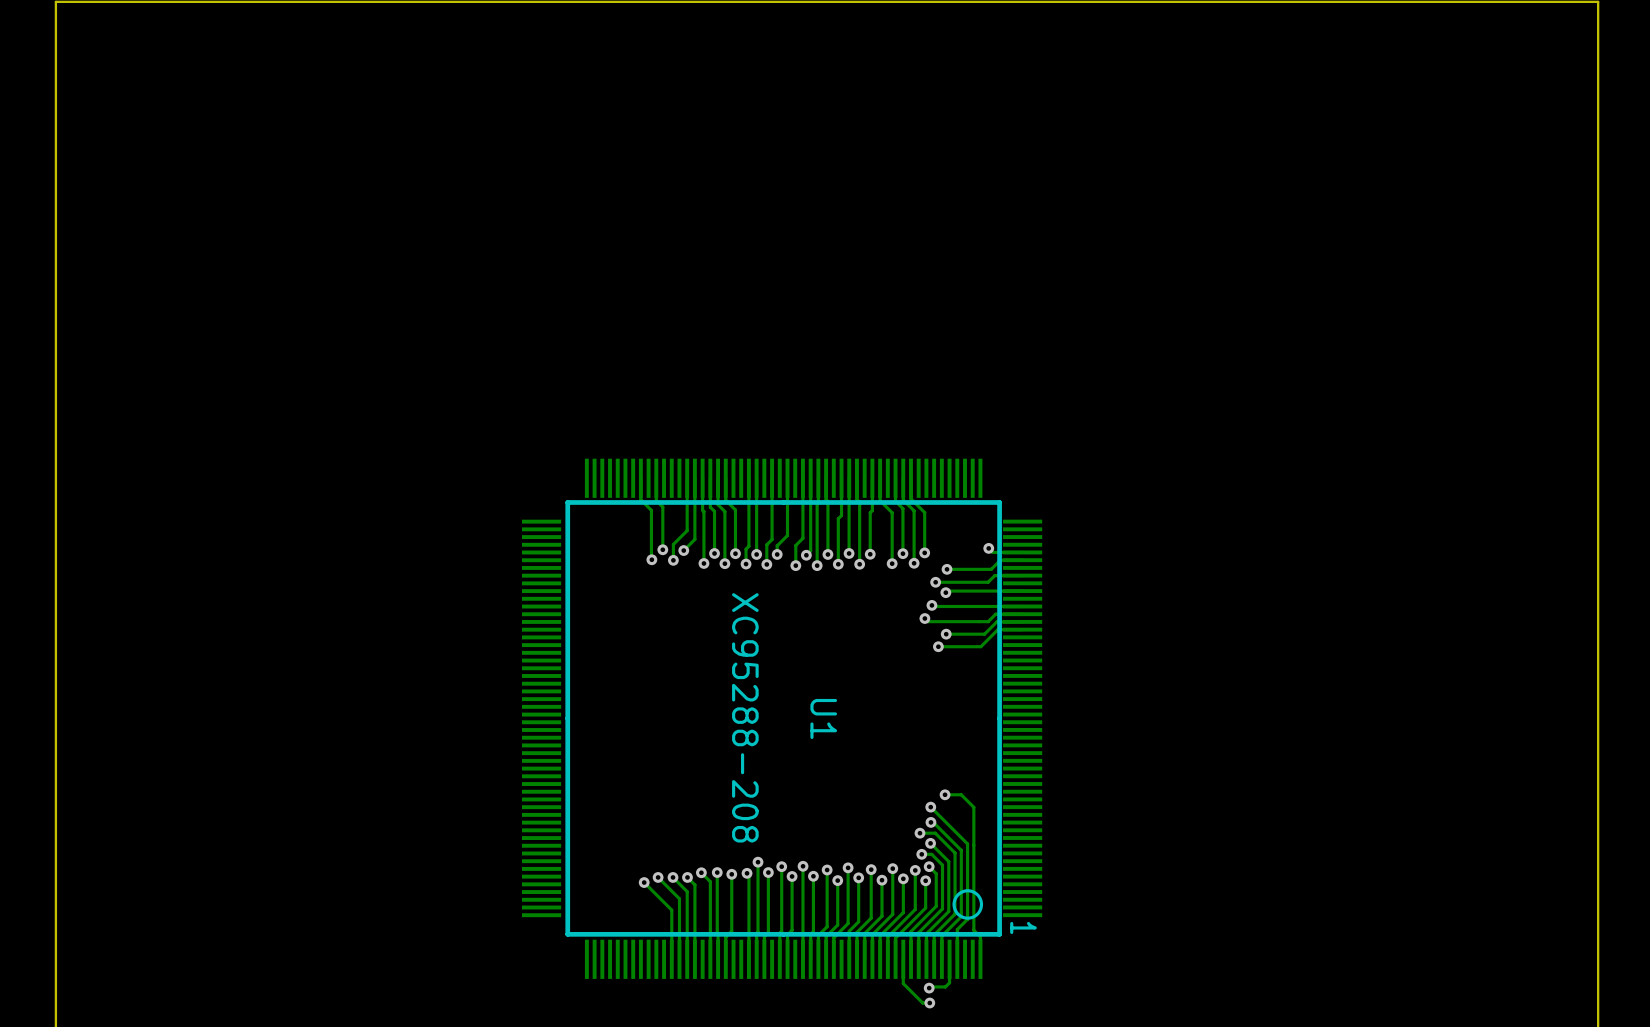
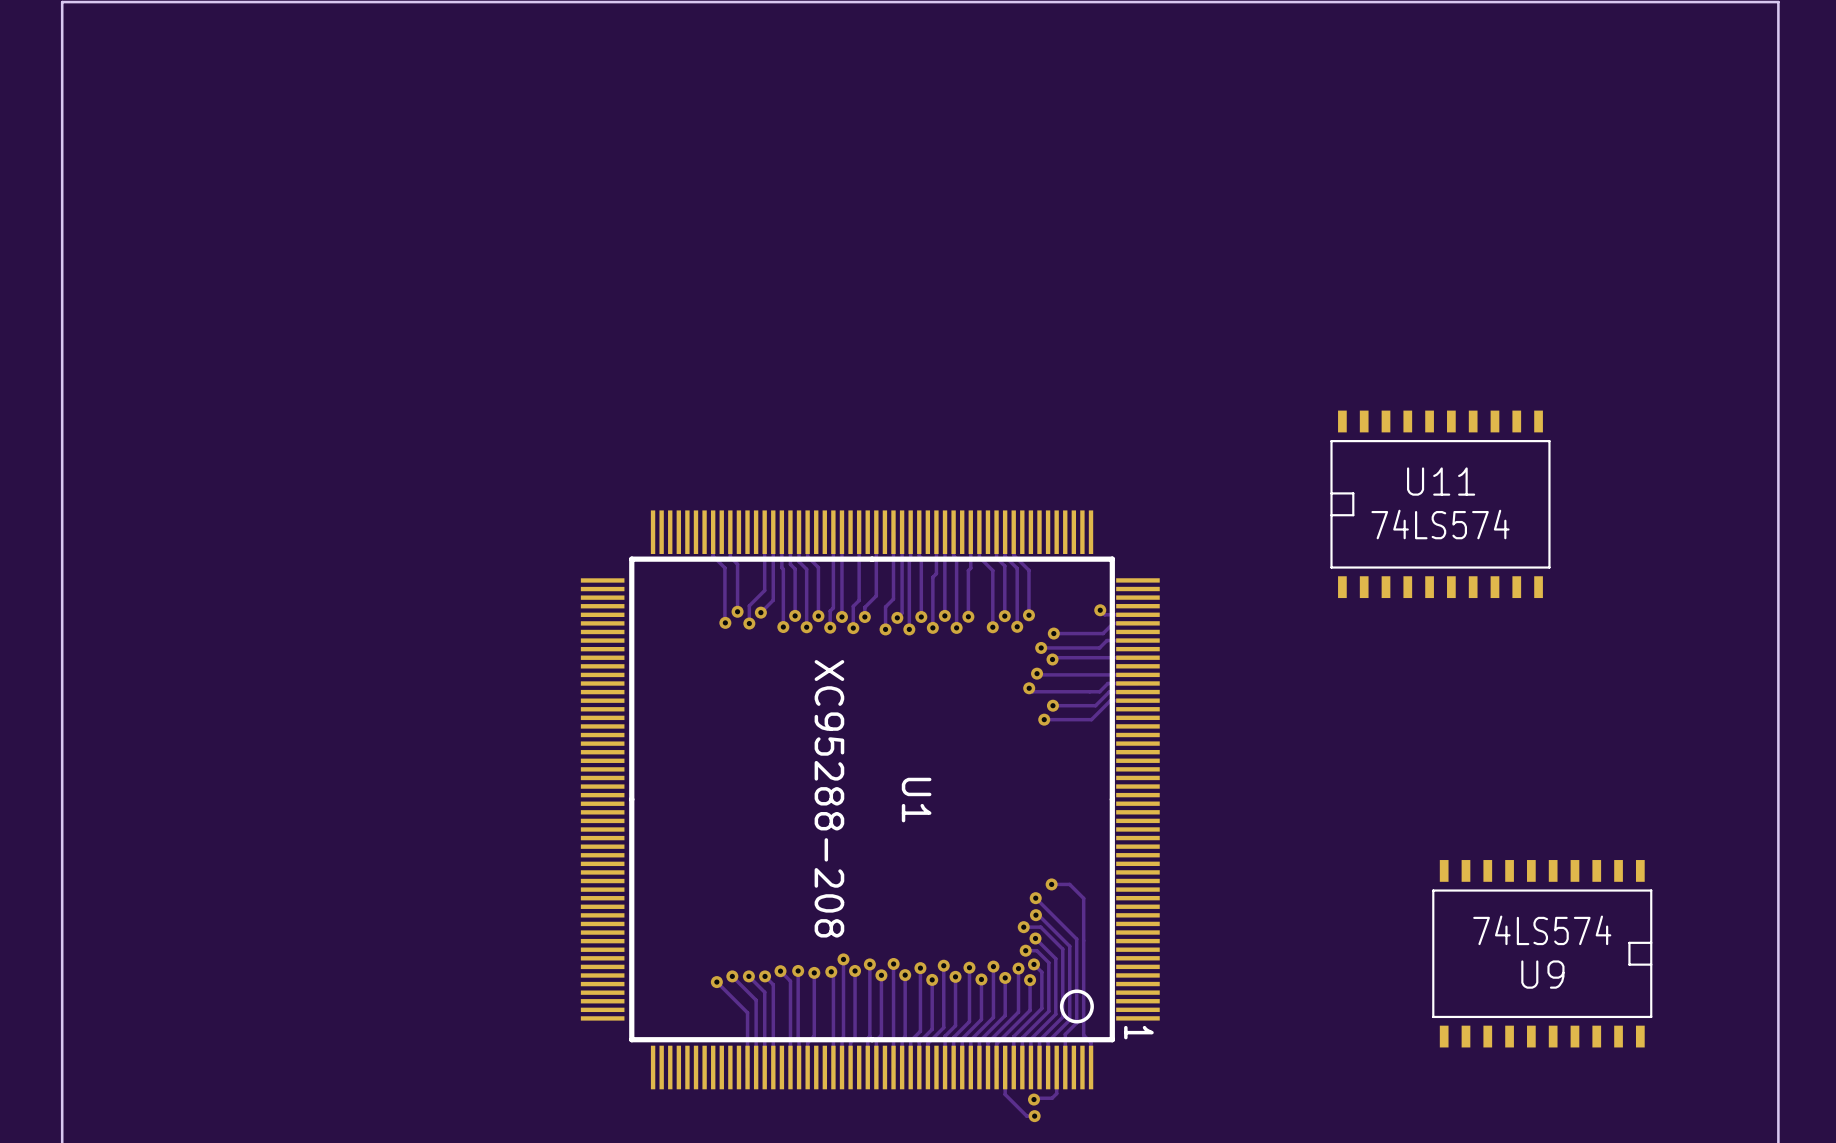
U11: none -> 74LS574 (1440, 504)
U9: none -> 74LS574 (1542, 953)

